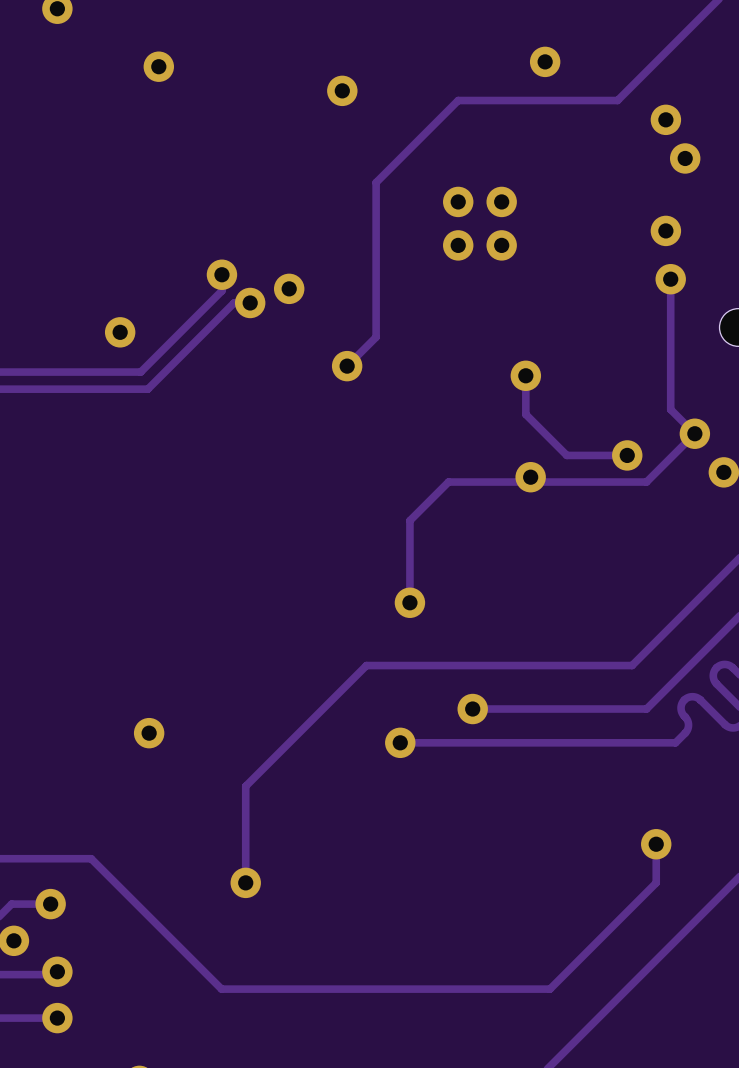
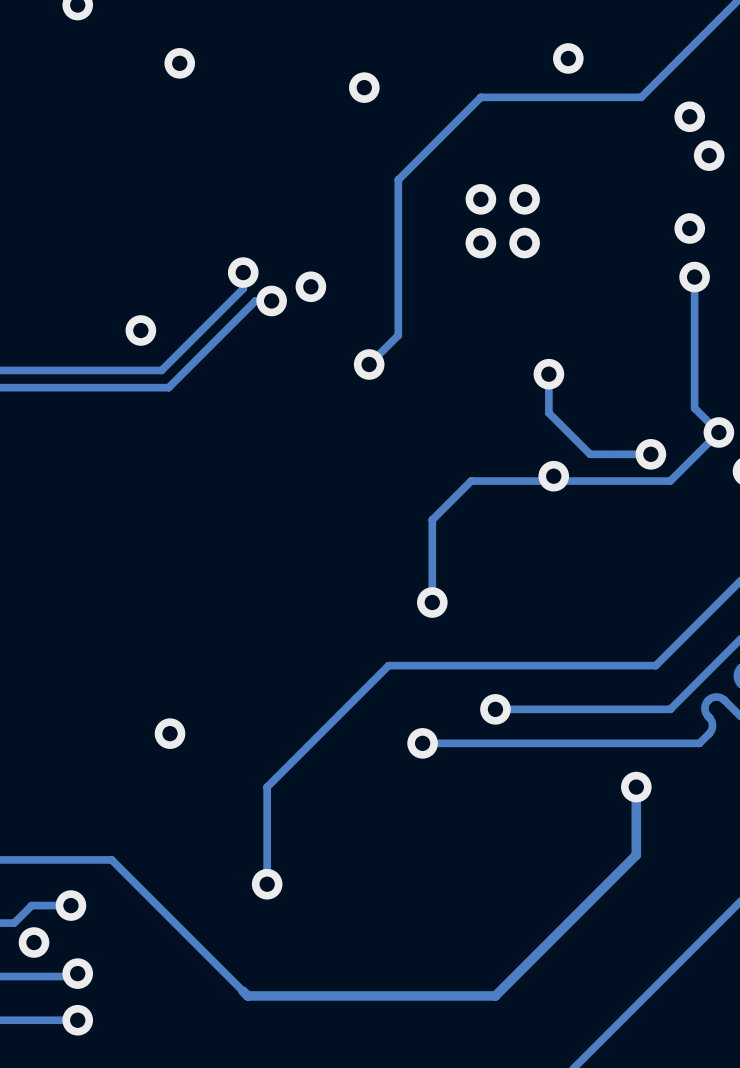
track: (656, 844) (656, 882) (549, 989) (221, 989) -> (636, 787) (636, 855) (495, 995) (247, 995) (242, 991)
via position: (656, 844) -> (636, 787)

